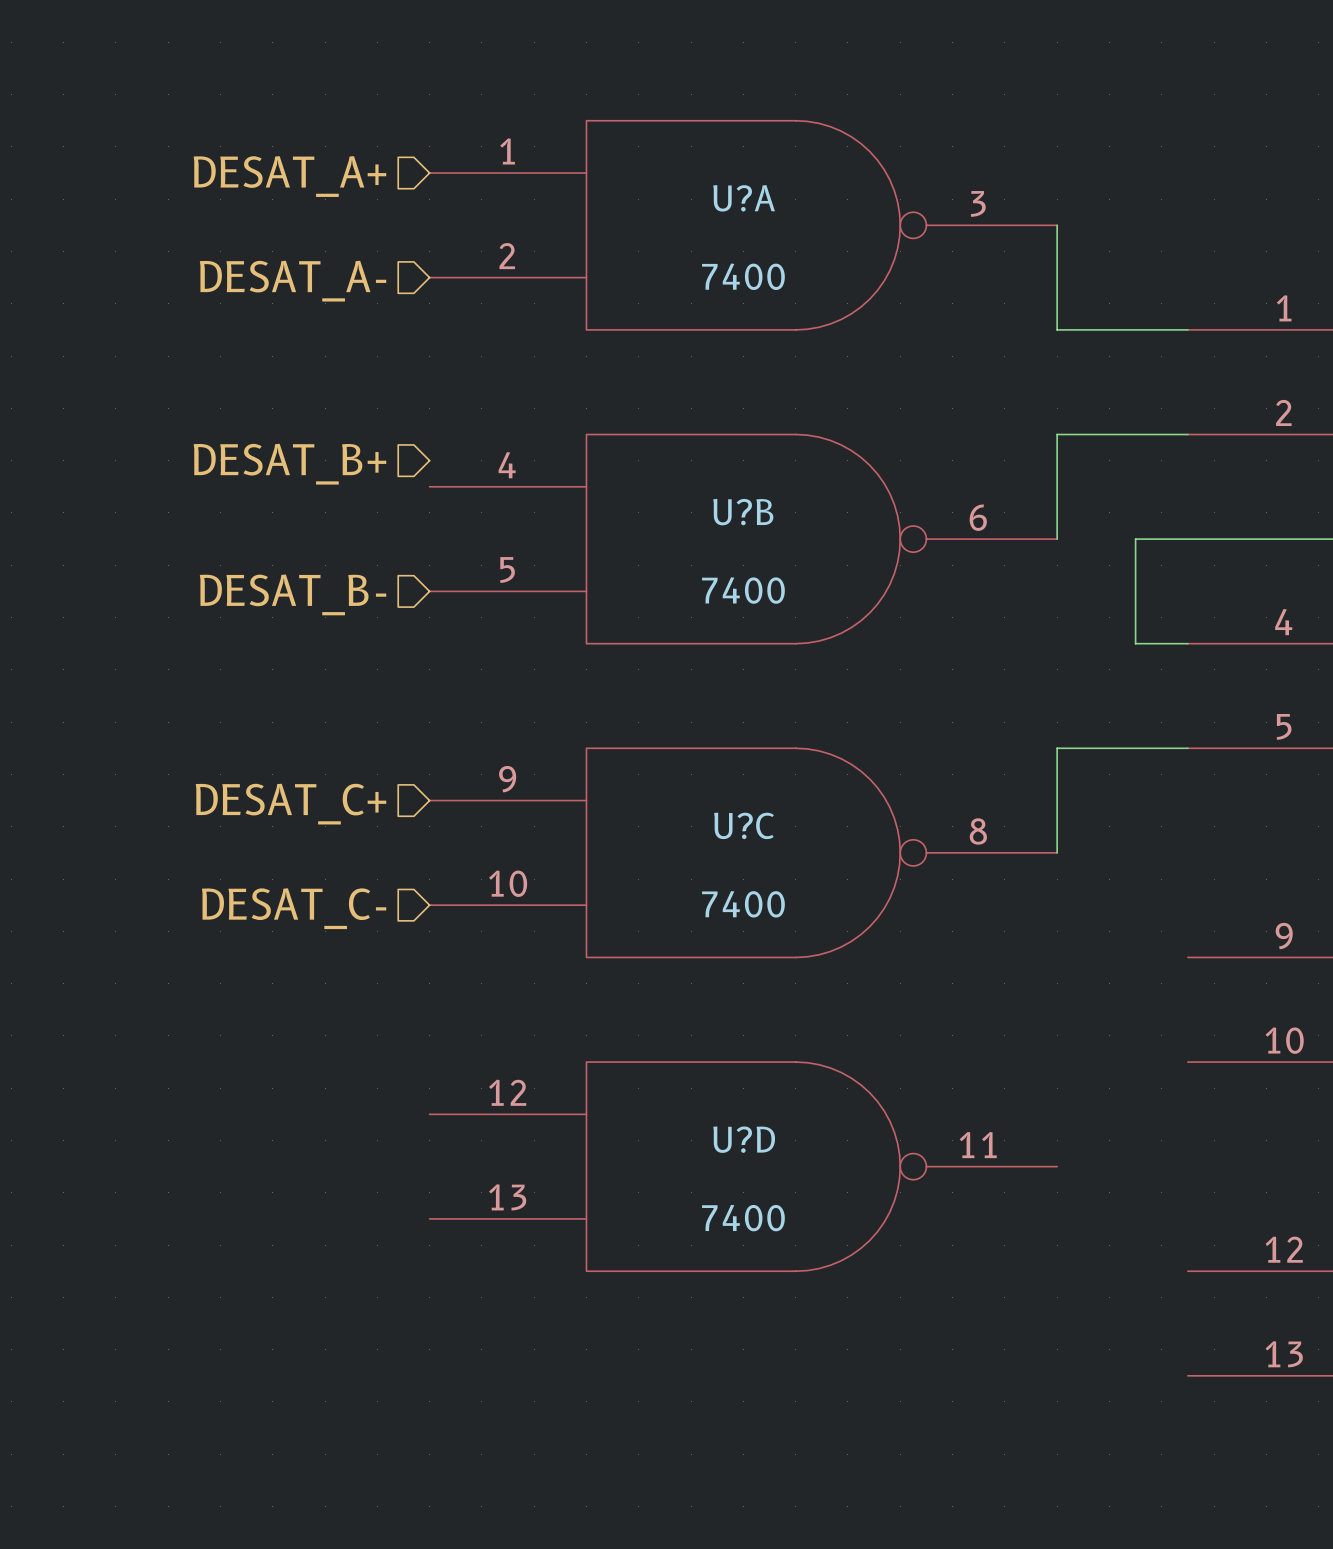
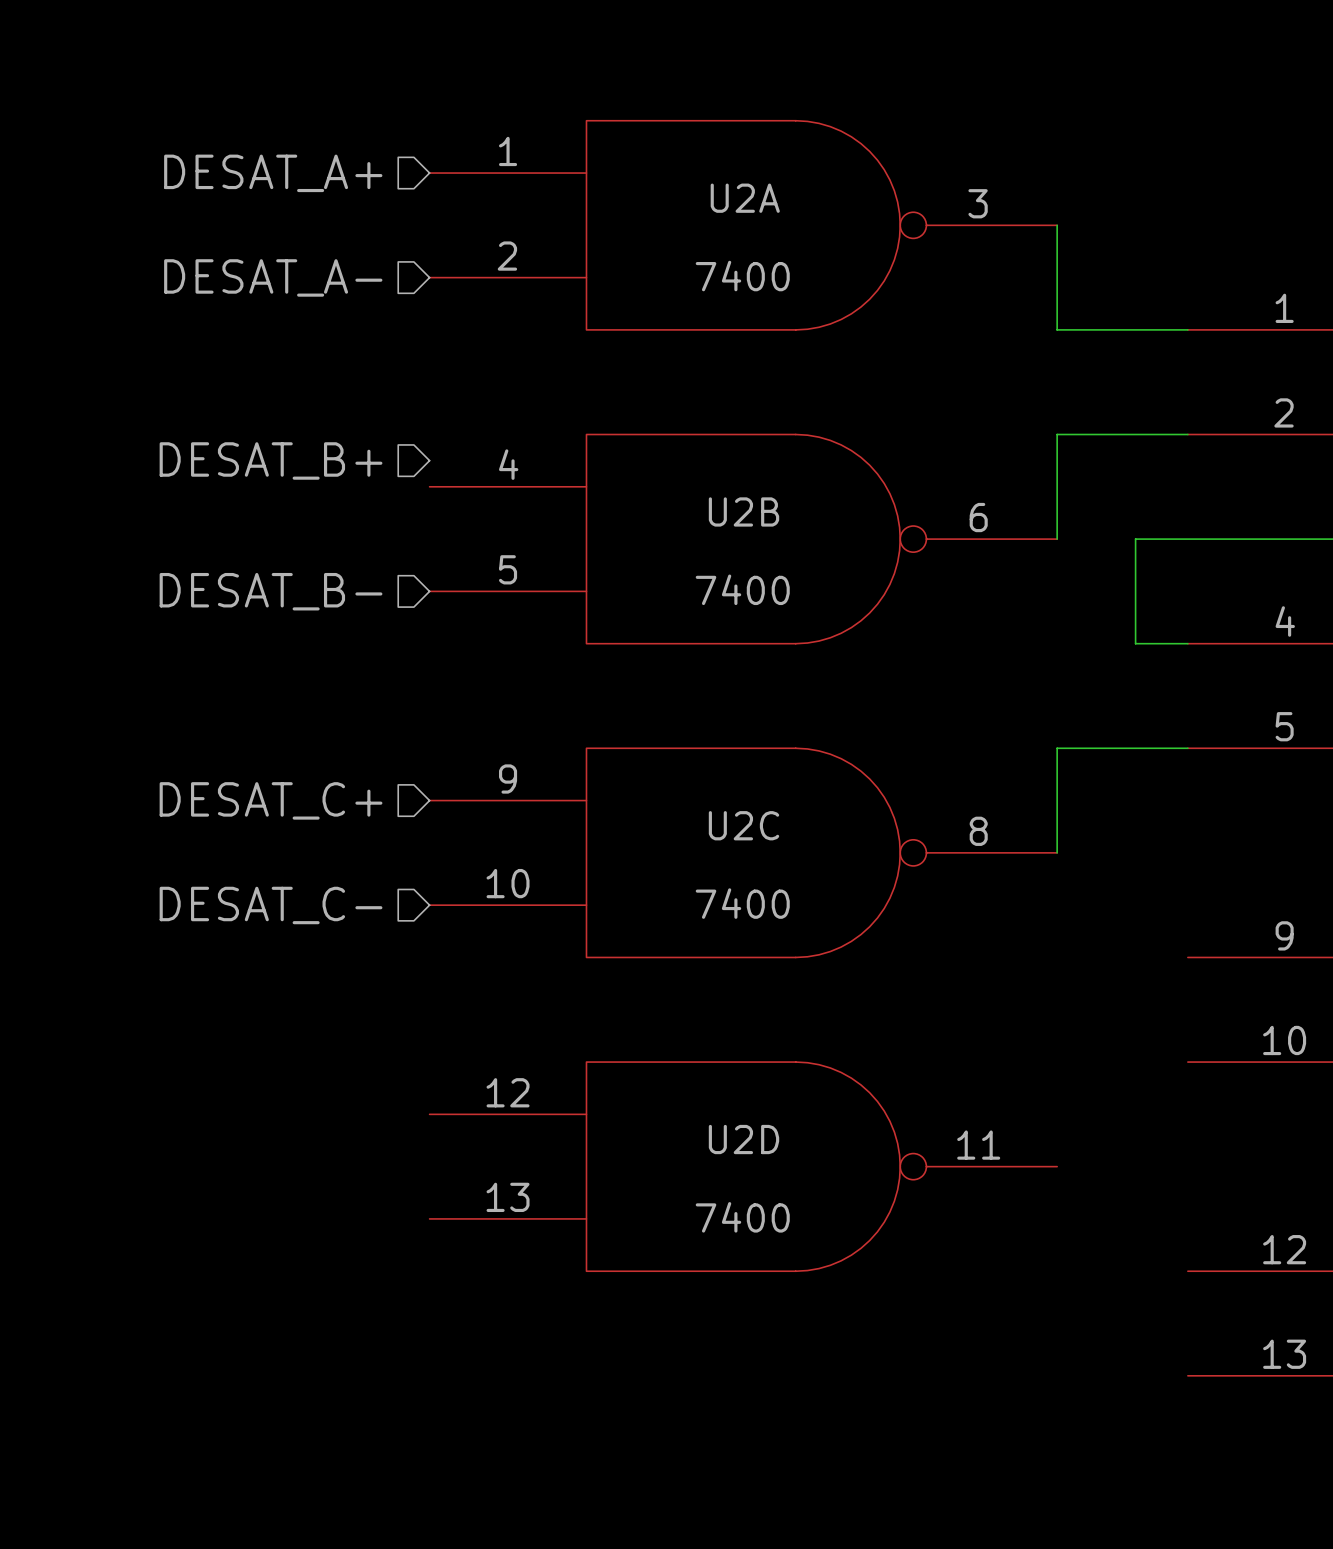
U?A name: U?A (744, 198) -> U2A (745, 198)
U?B name: U?B (743, 512) -> U2B (743, 511)
U?C name: U?C (744, 825) -> U2C (743, 825)
U?D name: U?D (744, 1139) -> U2D (743, 1139)

